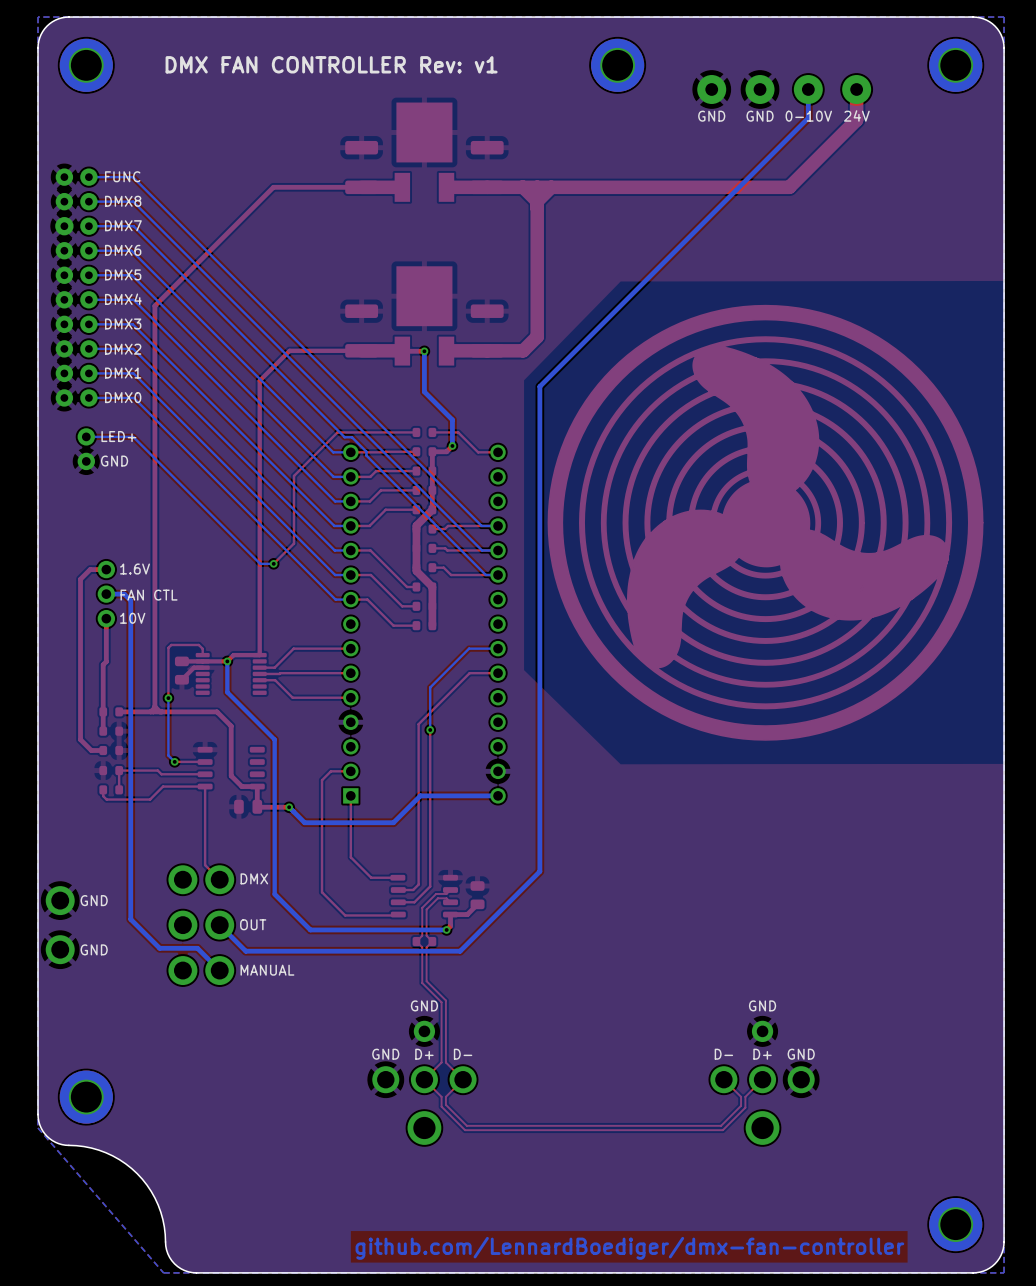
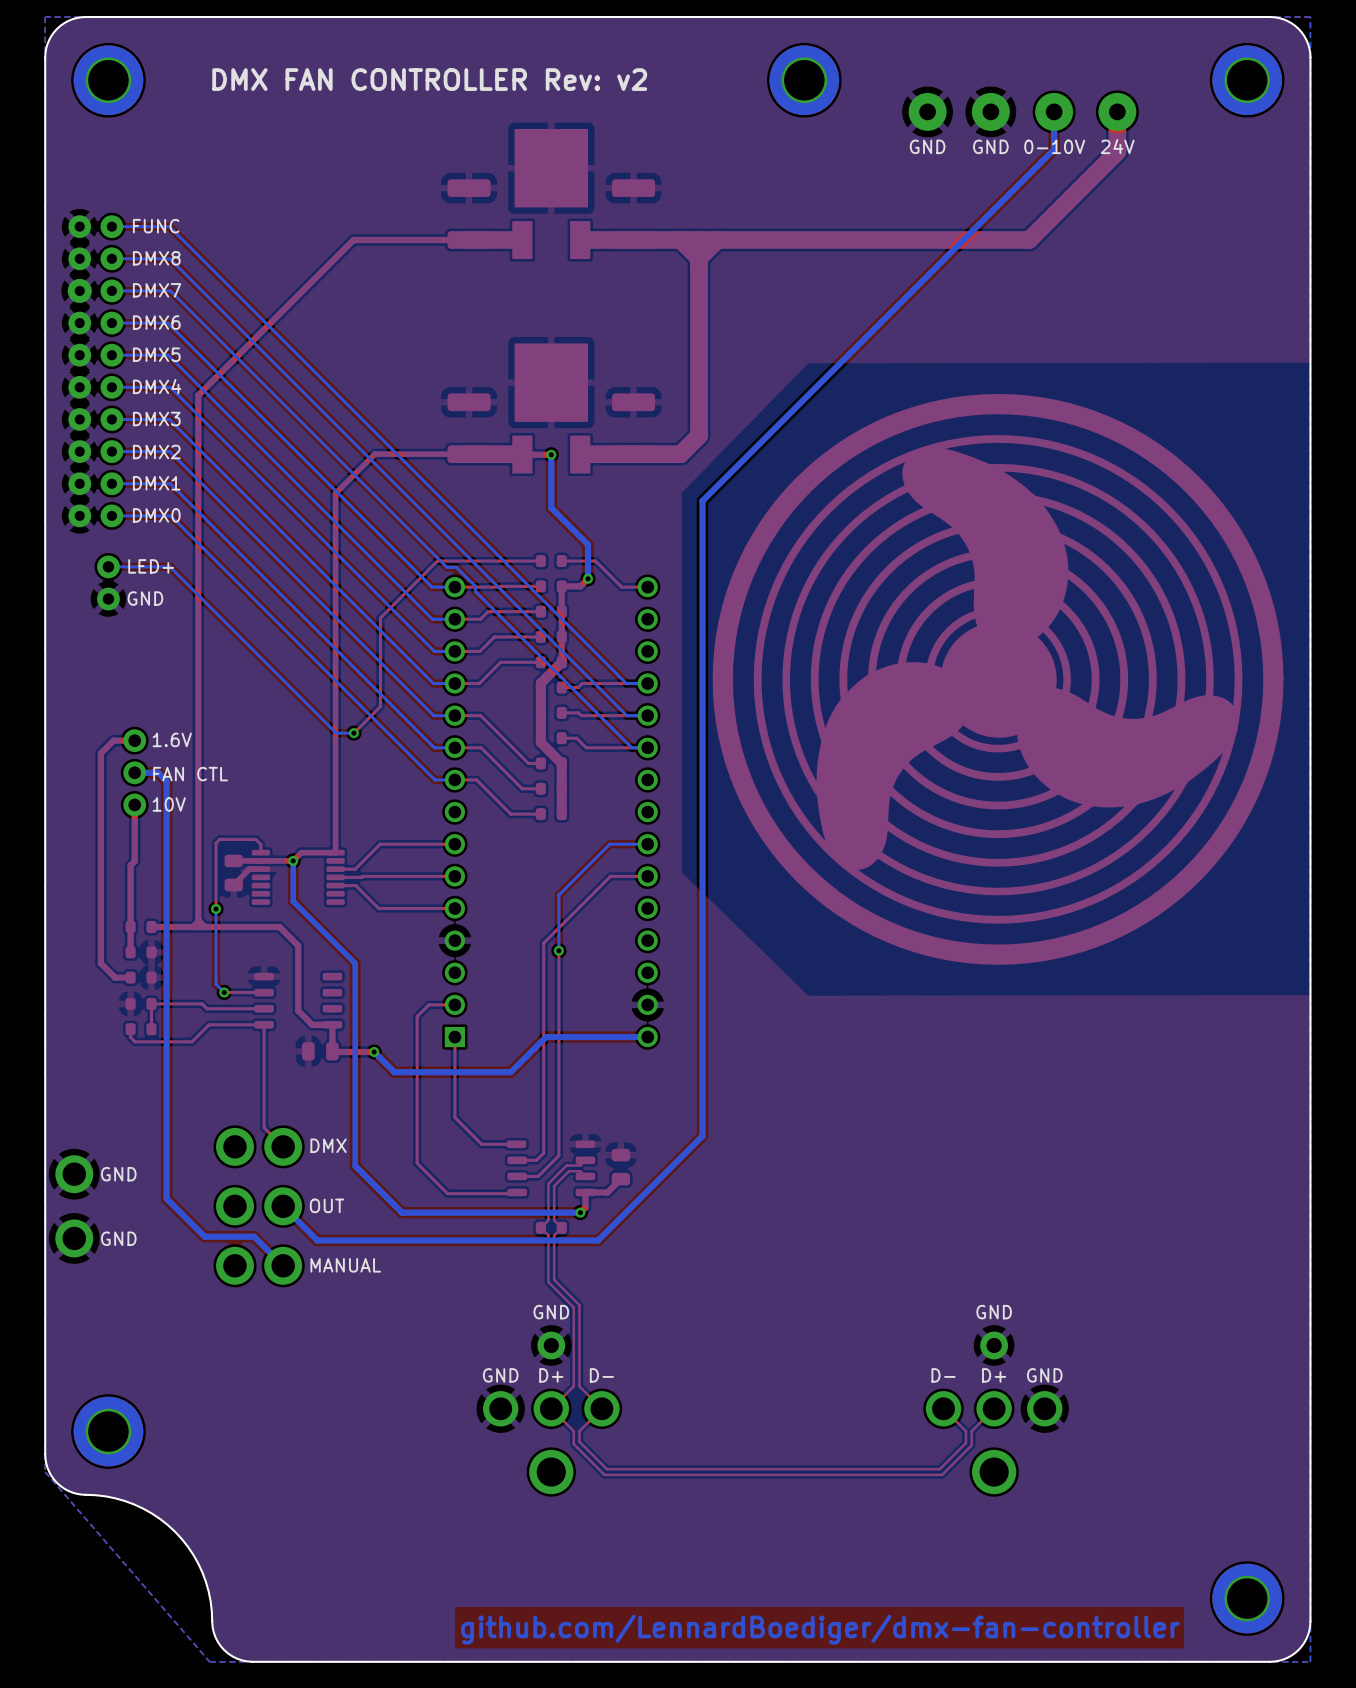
text: DMX FAN CONTROLLER Rev: v1 (331, 64) -> DMX FAN CONTROLLER Rev: v2 (429, 79)

